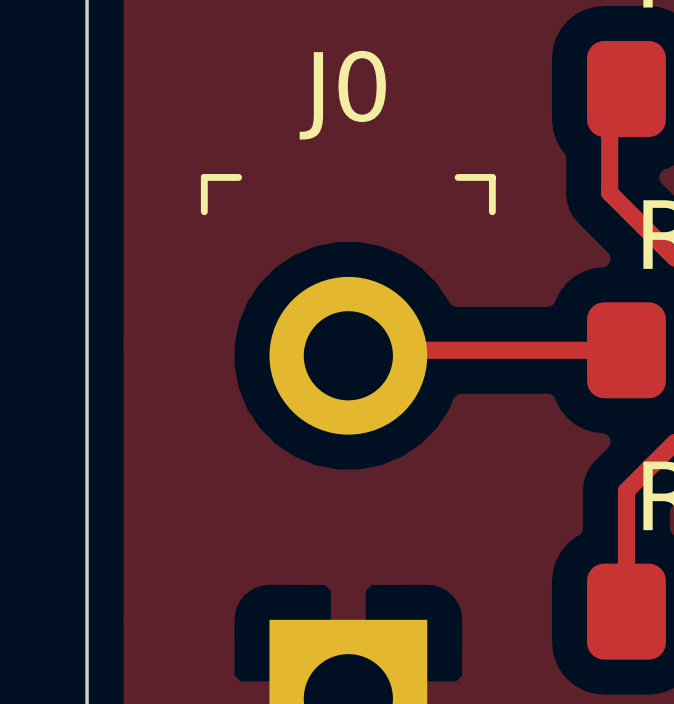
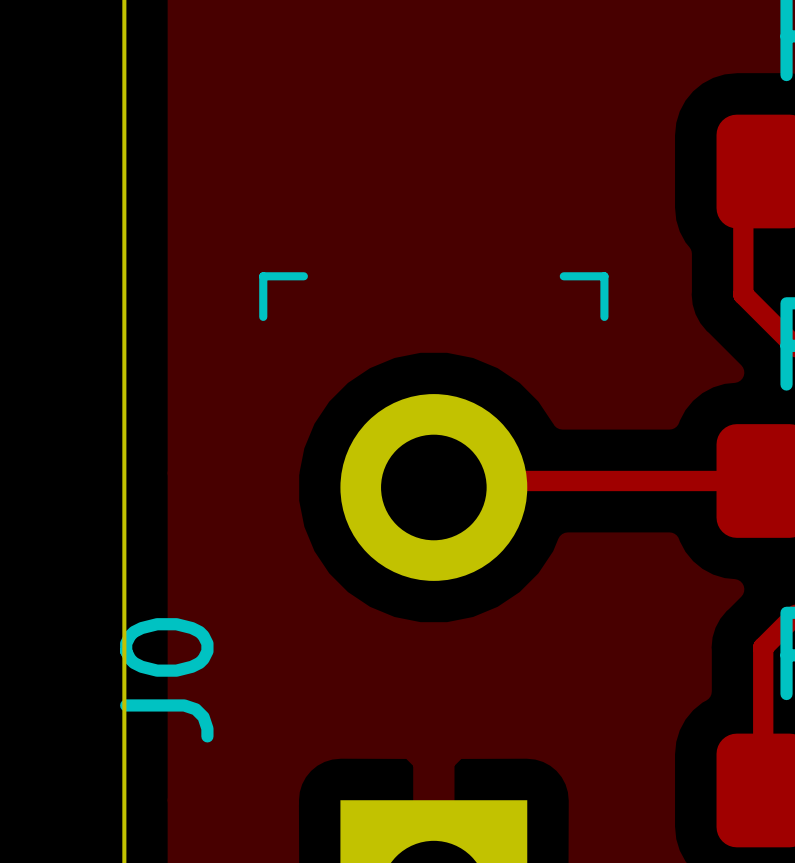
J0 name rotation: 0° (342, 95) -> 90° counterclockwise (166, 680)
J0 name position: J0 (342, 95) -> J0 (166, 680)

